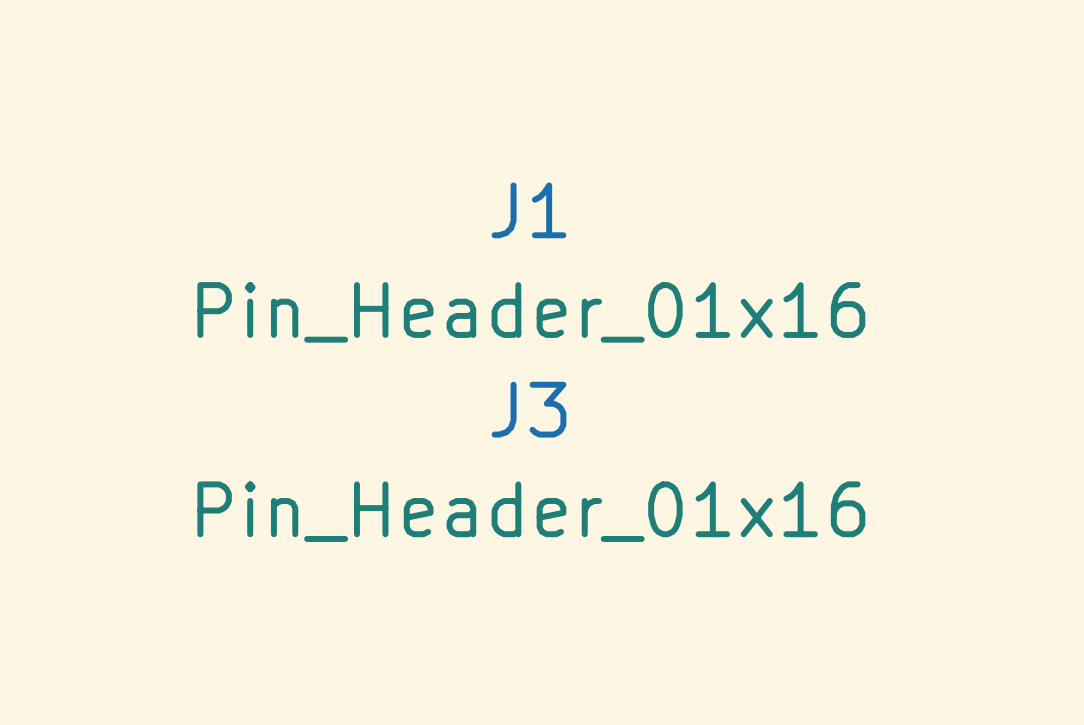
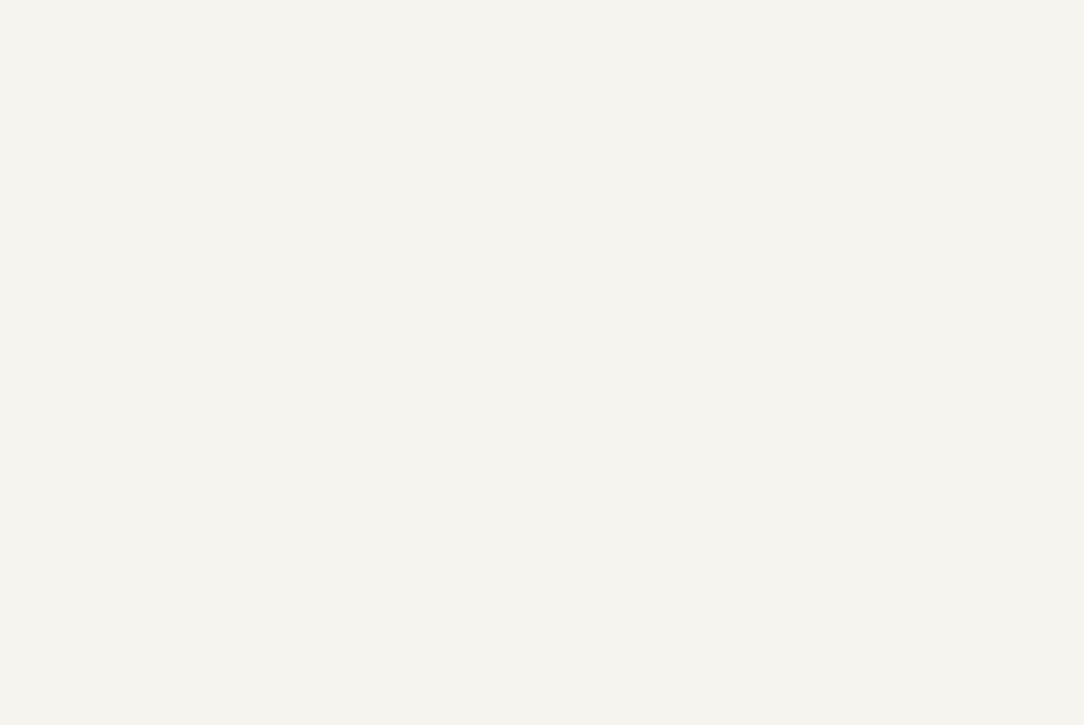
J1: Pin_Header_01x16 (531, 262) -> none
J3: Pin_Header_01x16 (531, 461) -> none

